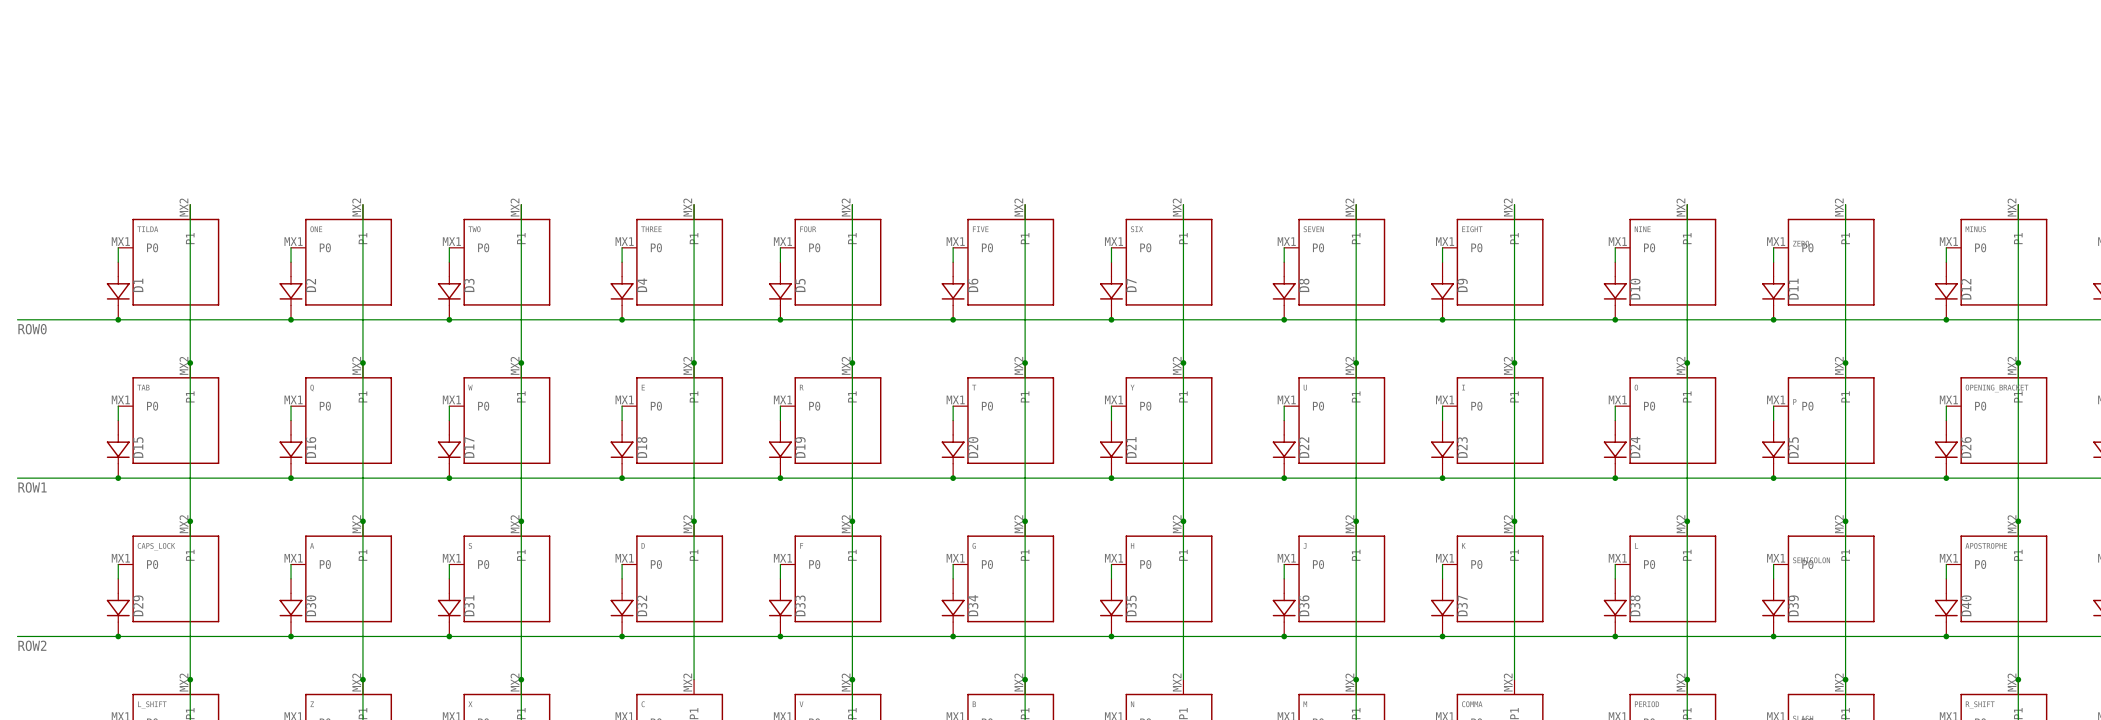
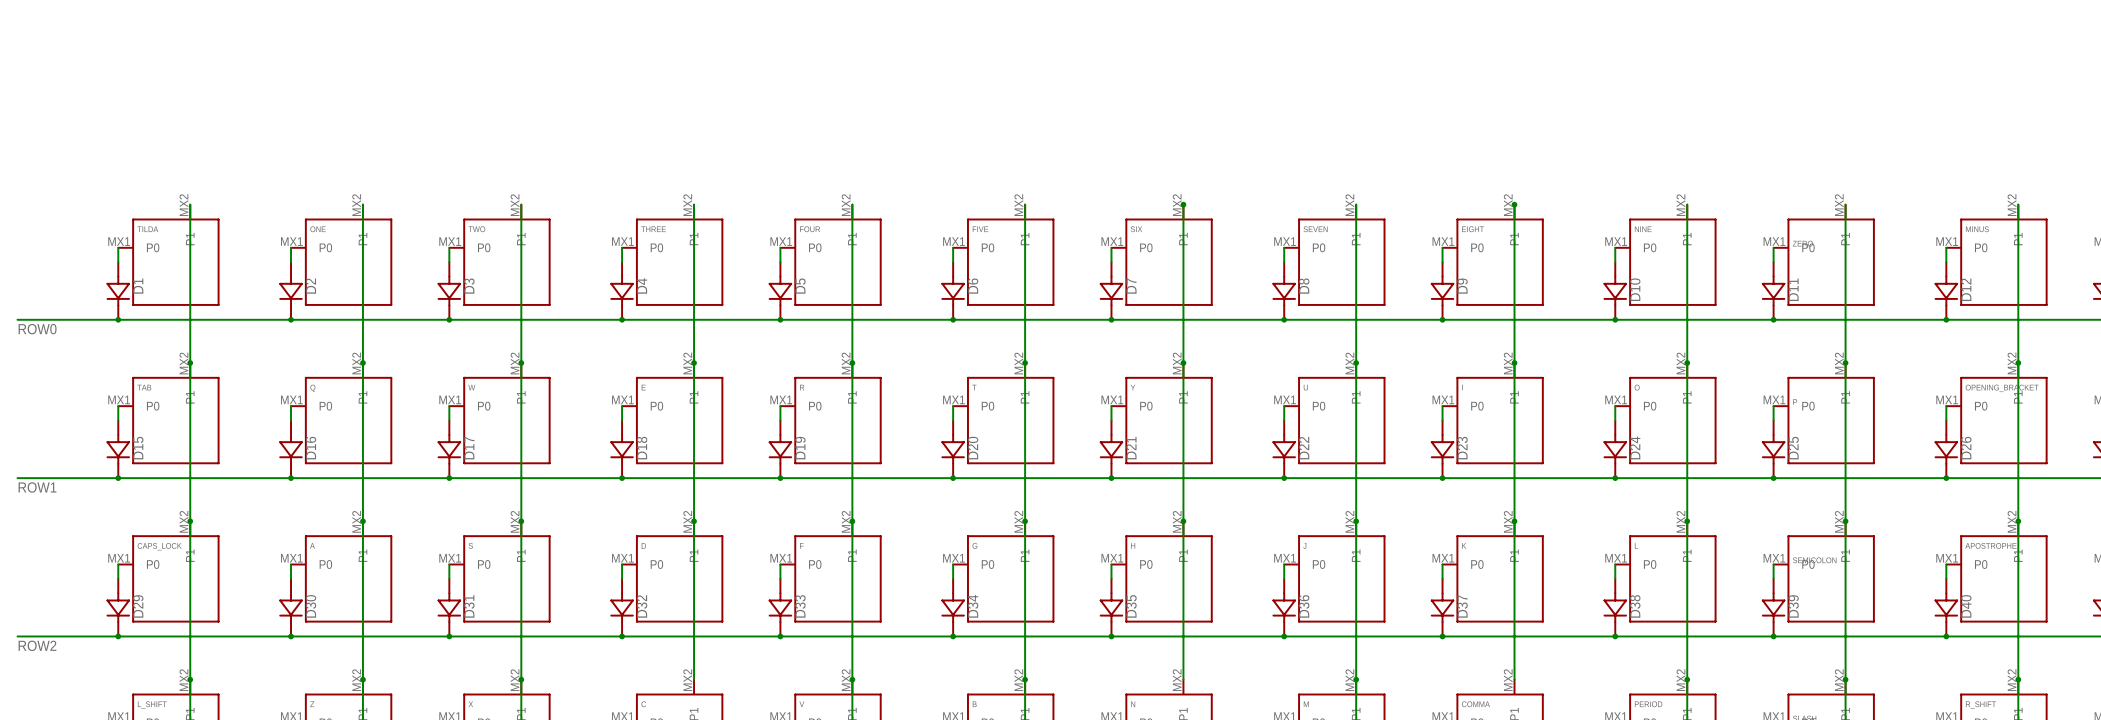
junction: none -> (1183, 204)
junction: none -> (1514, 204)

